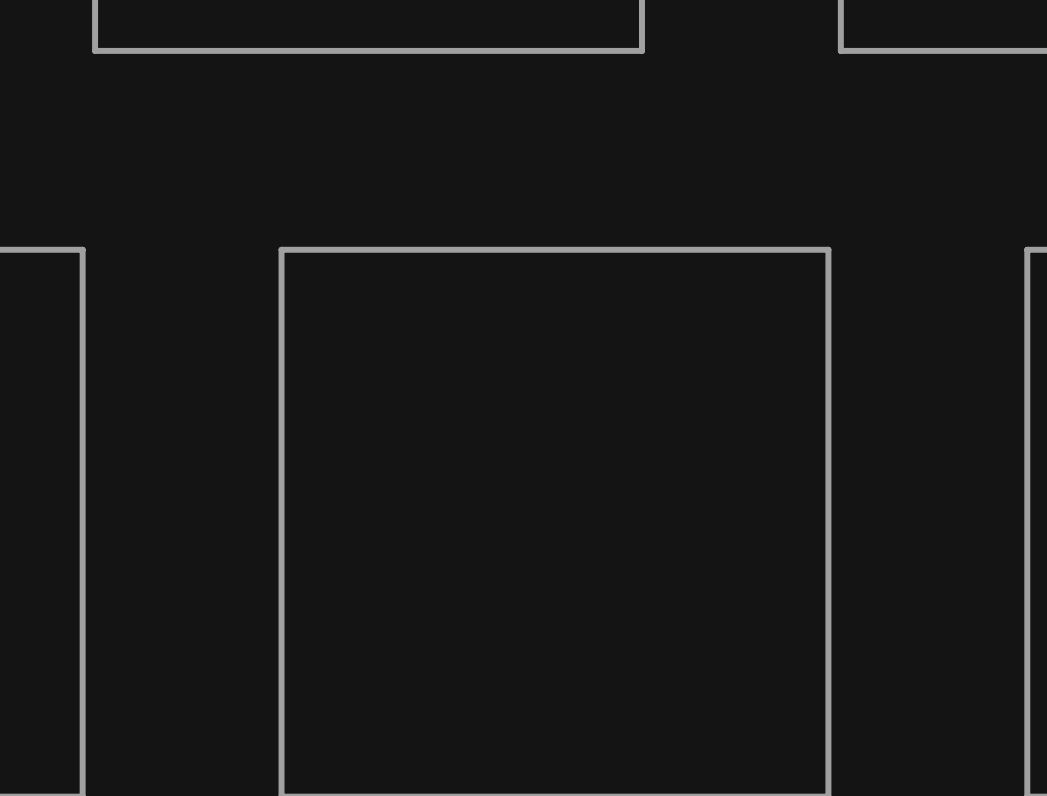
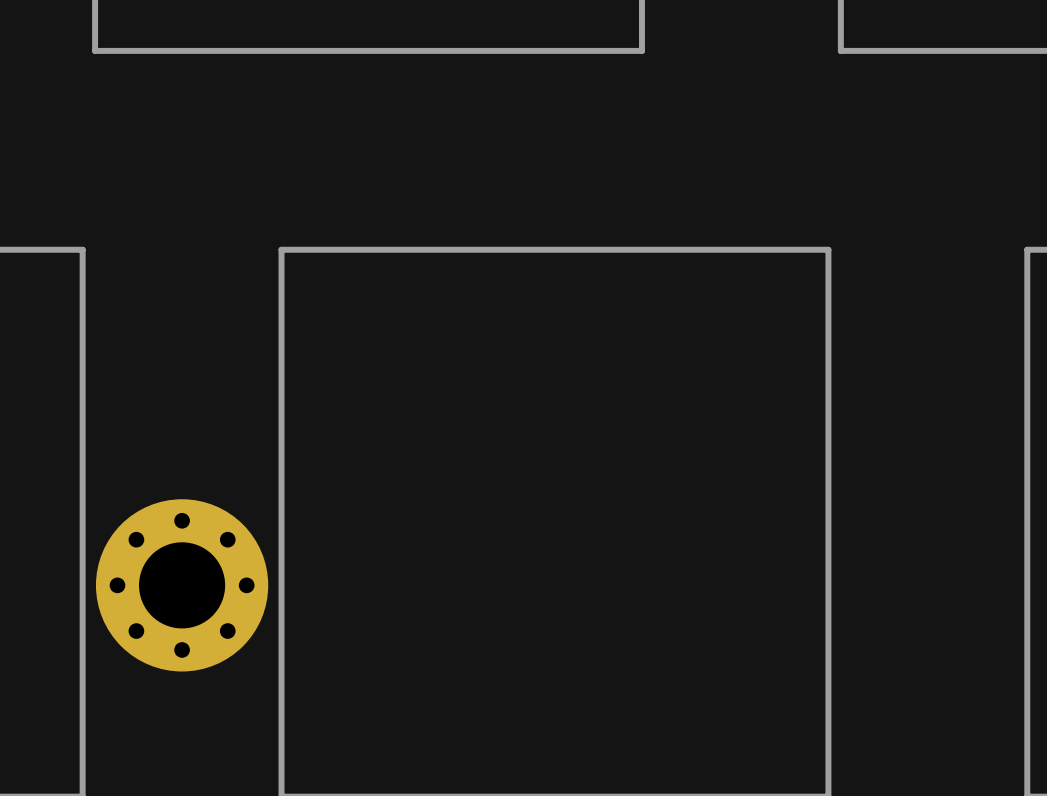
part: none -> (182, 585)

